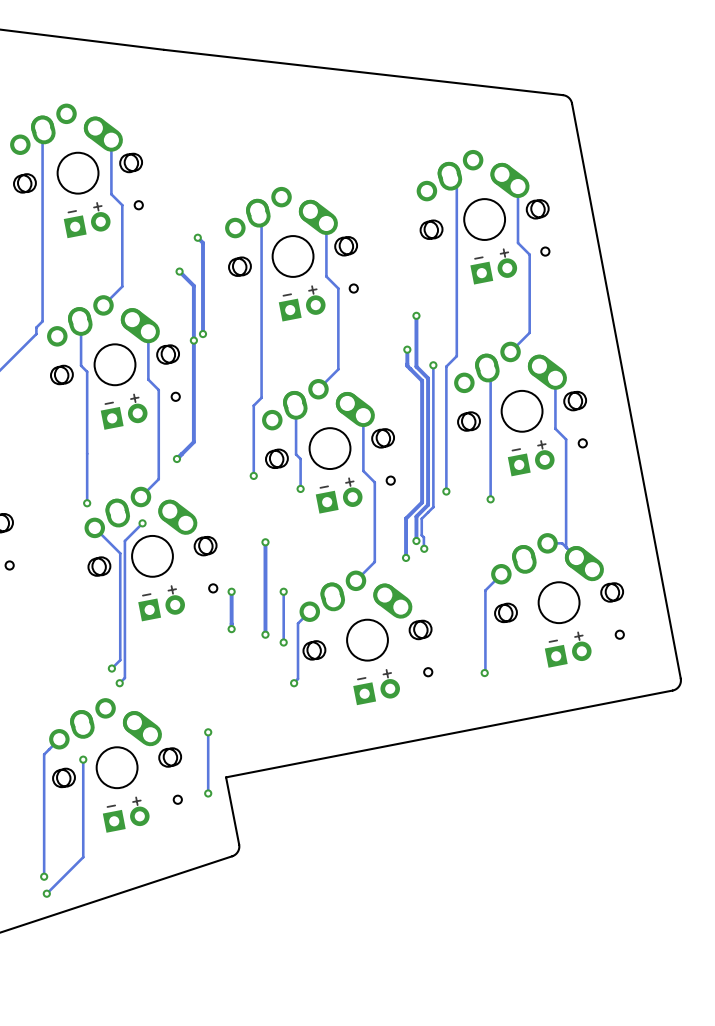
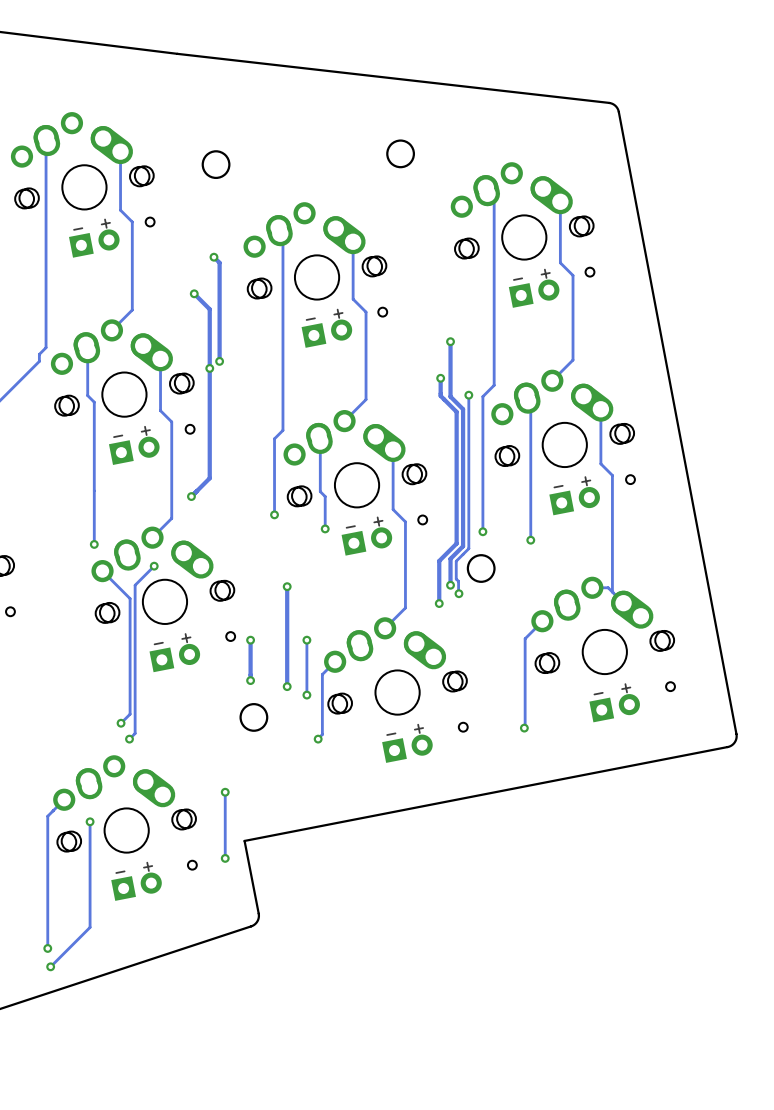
round board edge: none -> [386, 139, 416, 169]
round board edge: none -> [201, 150, 231, 180]
round board edge: none -> [466, 554, 496, 583]
round board edge: none -> [239, 703, 269, 732]

